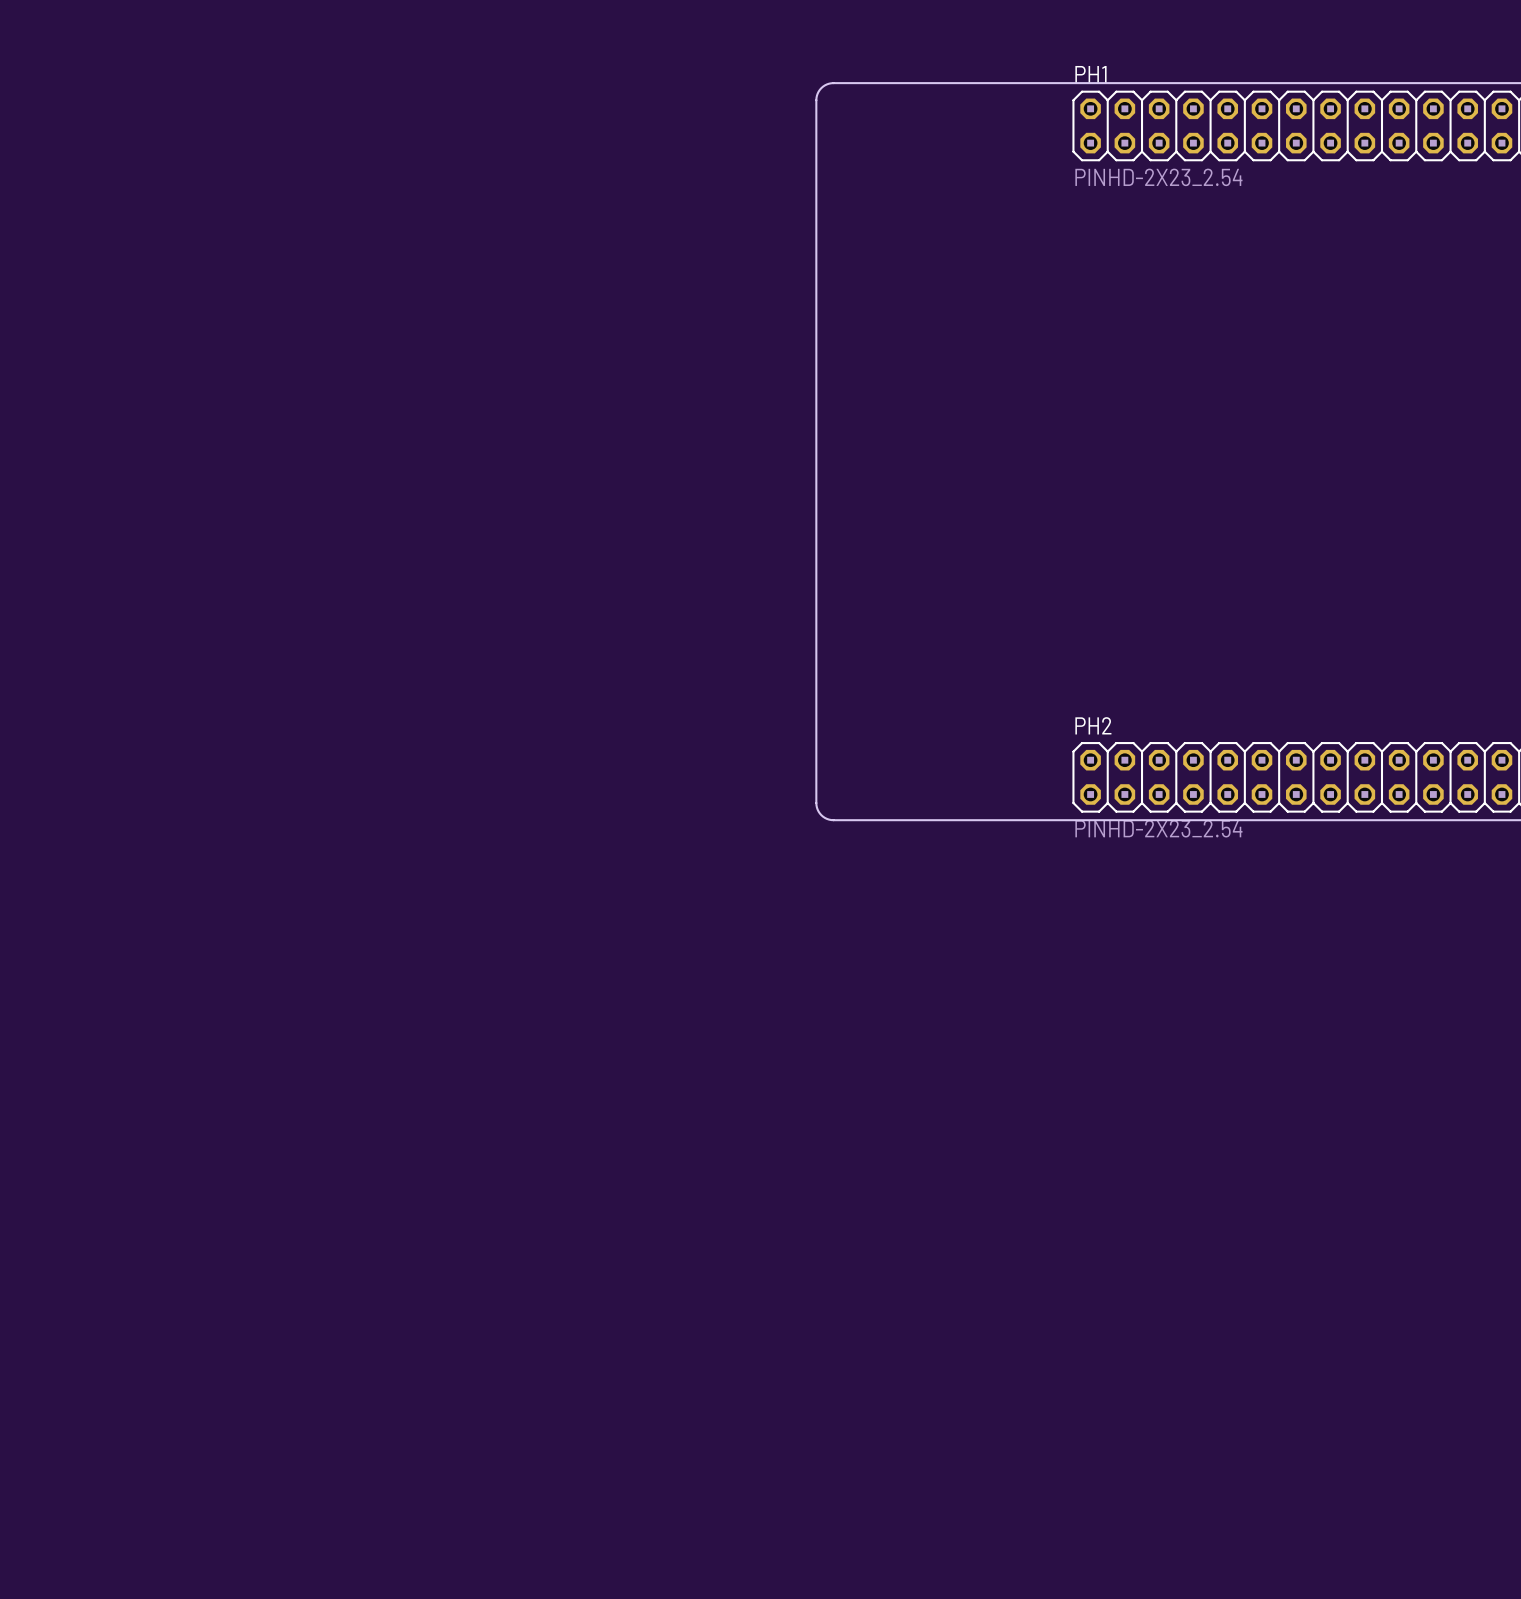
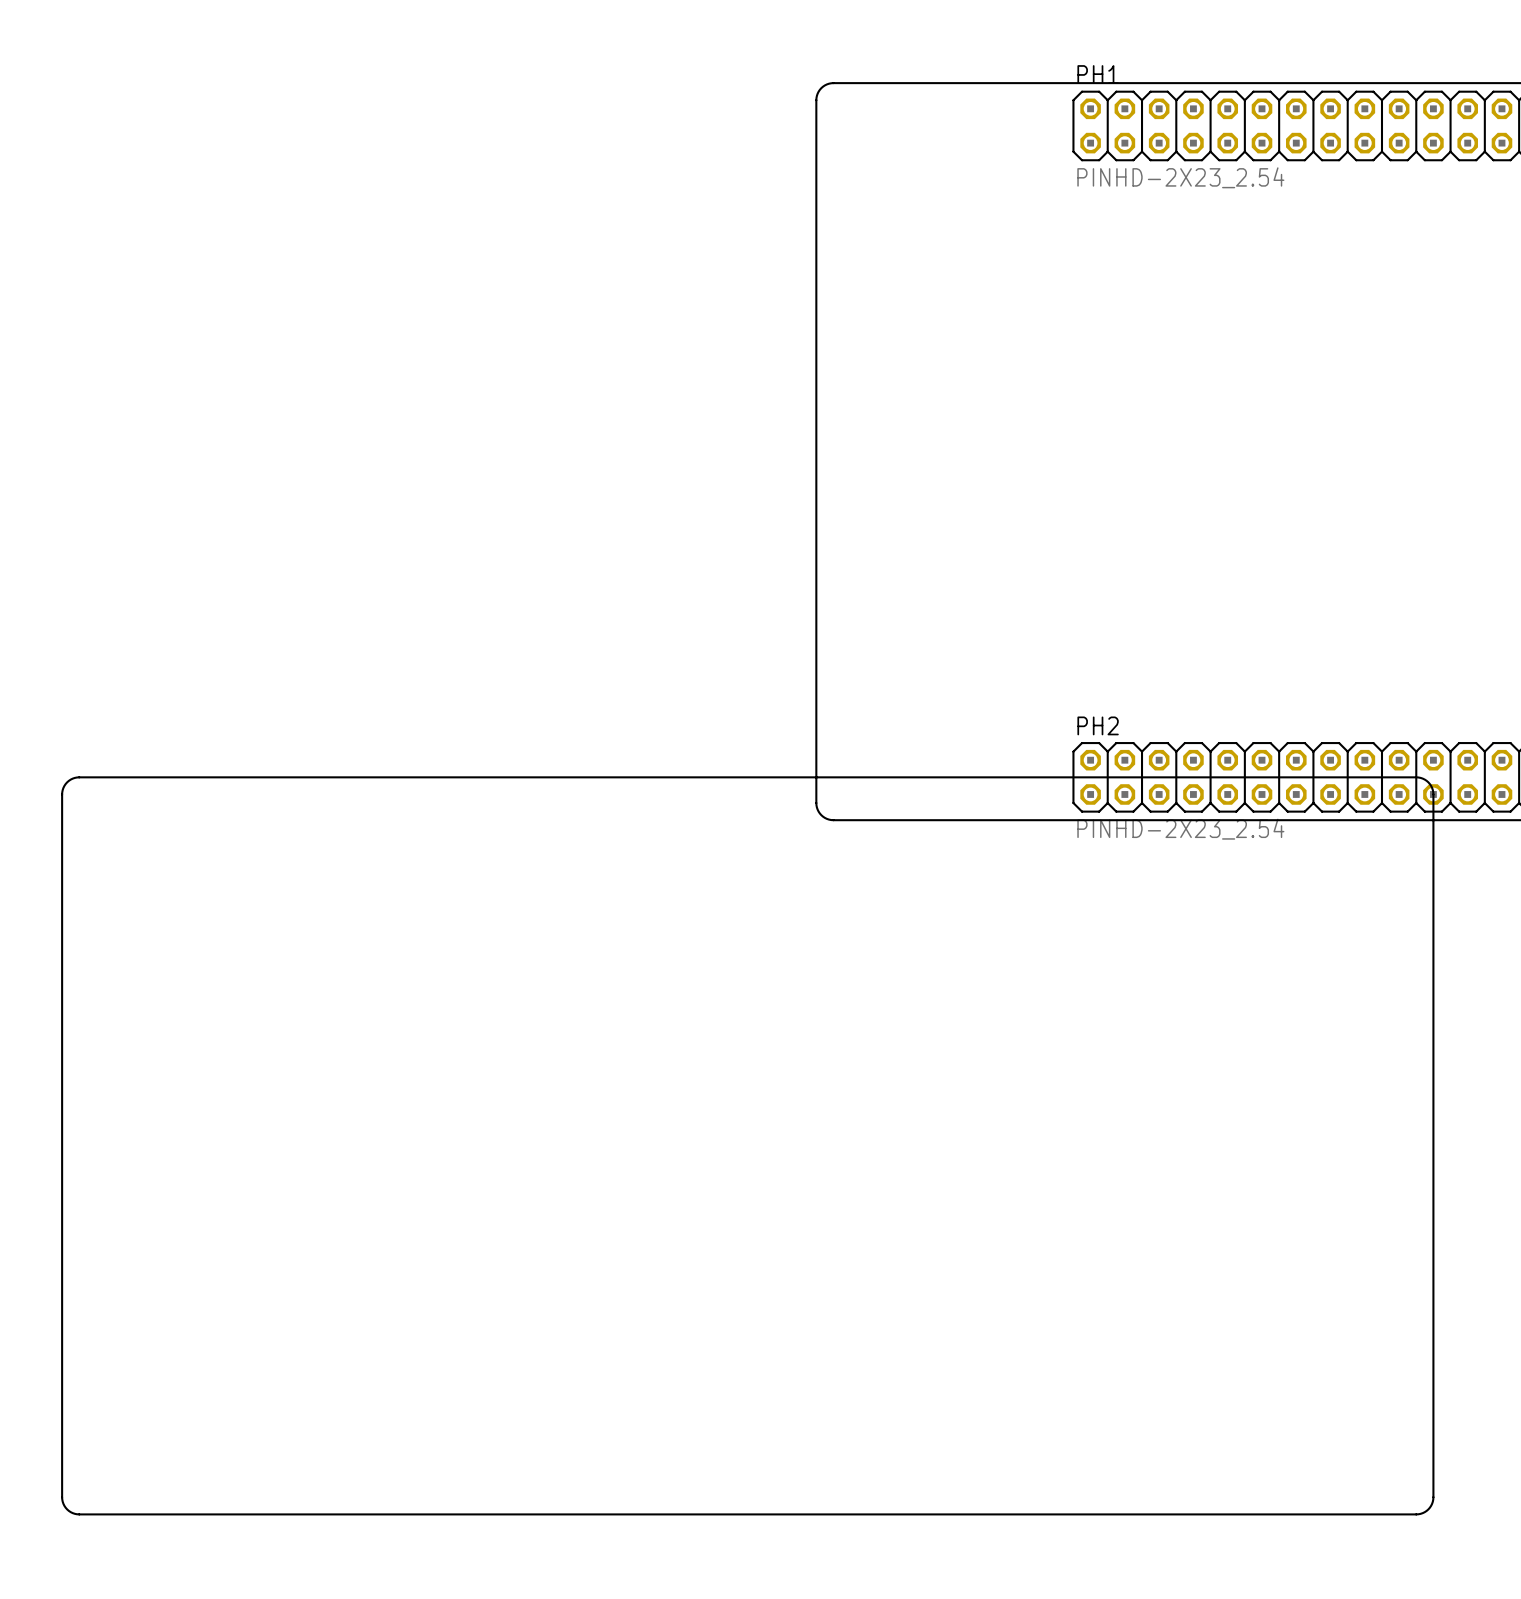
board edge: none -> (79, 777) (1416, 777) (1424, 779) (1431, 785) (1433, 794) (1433, 1497) (1431, 1505) (1424, 1512) (1416, 1514) (79, 1514) (70, 1512) (64, 1505) (62, 1497) (62, 794) (67, 782) (79, 777)

